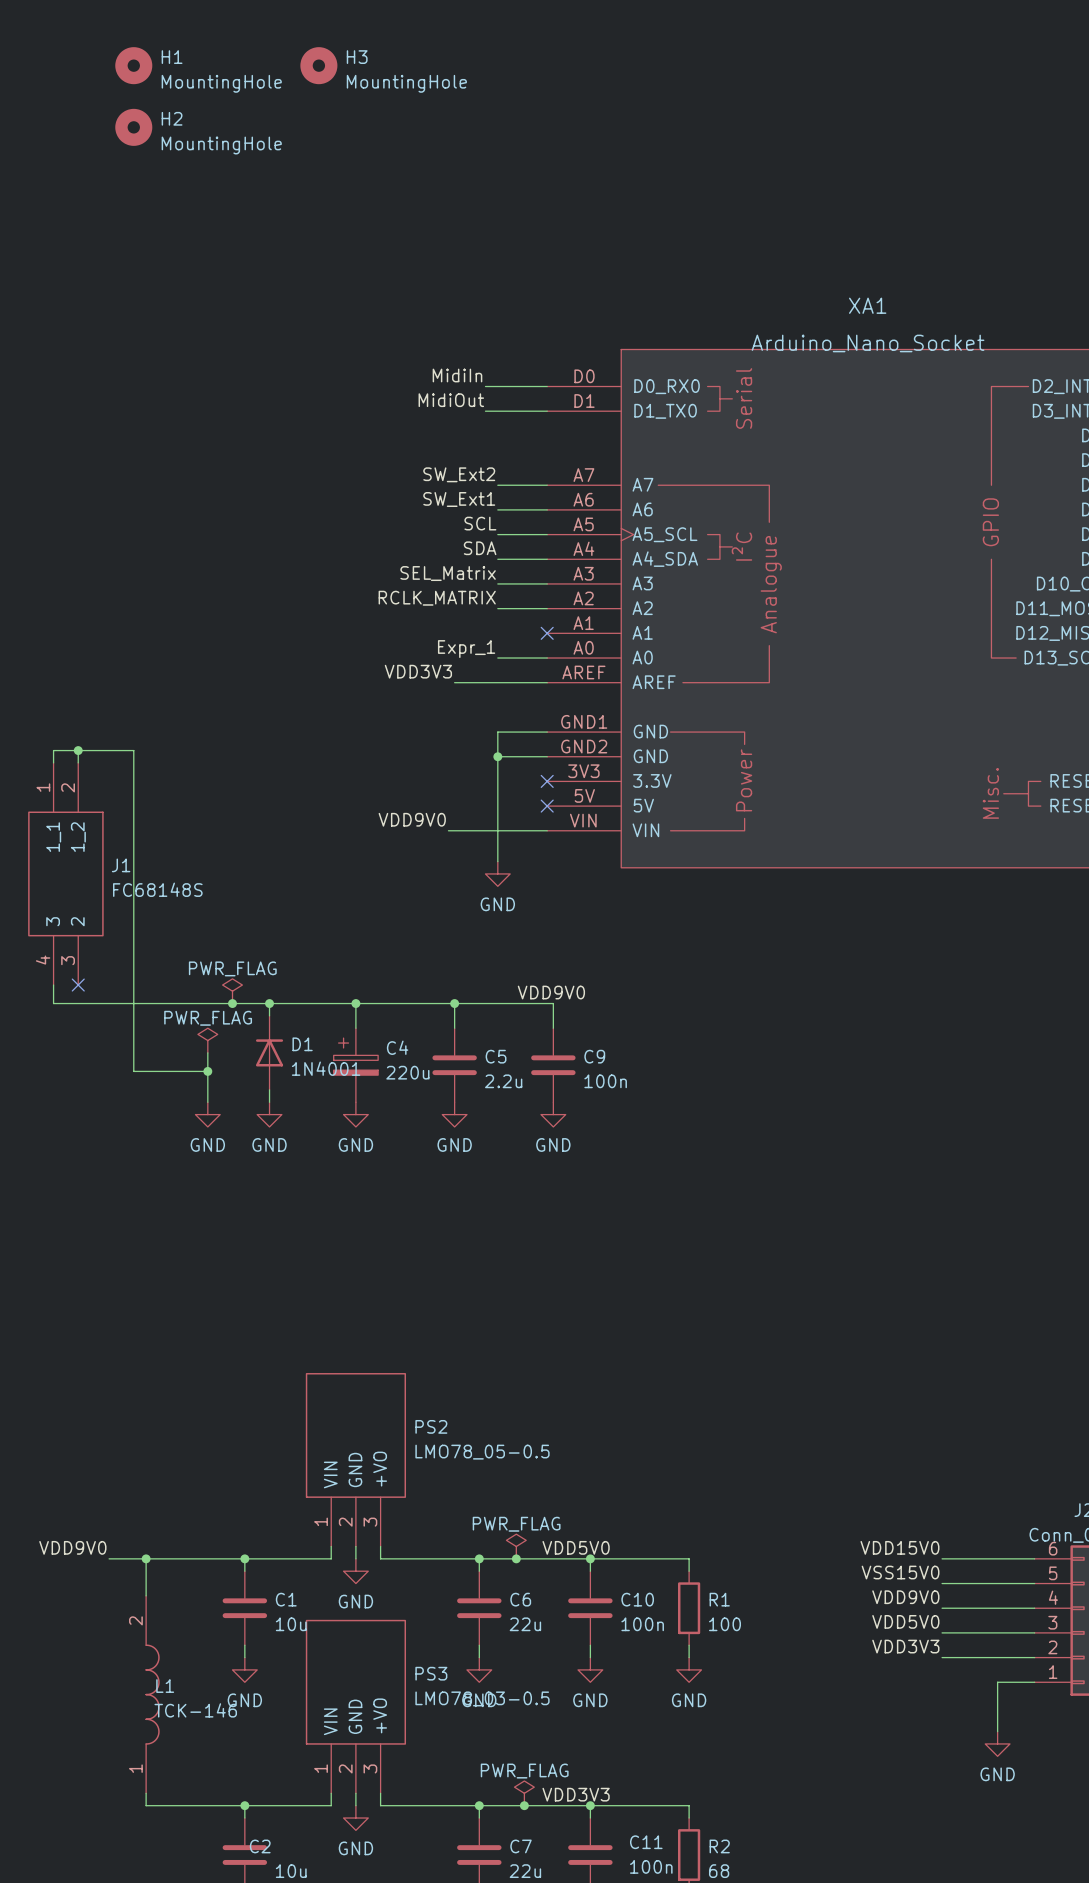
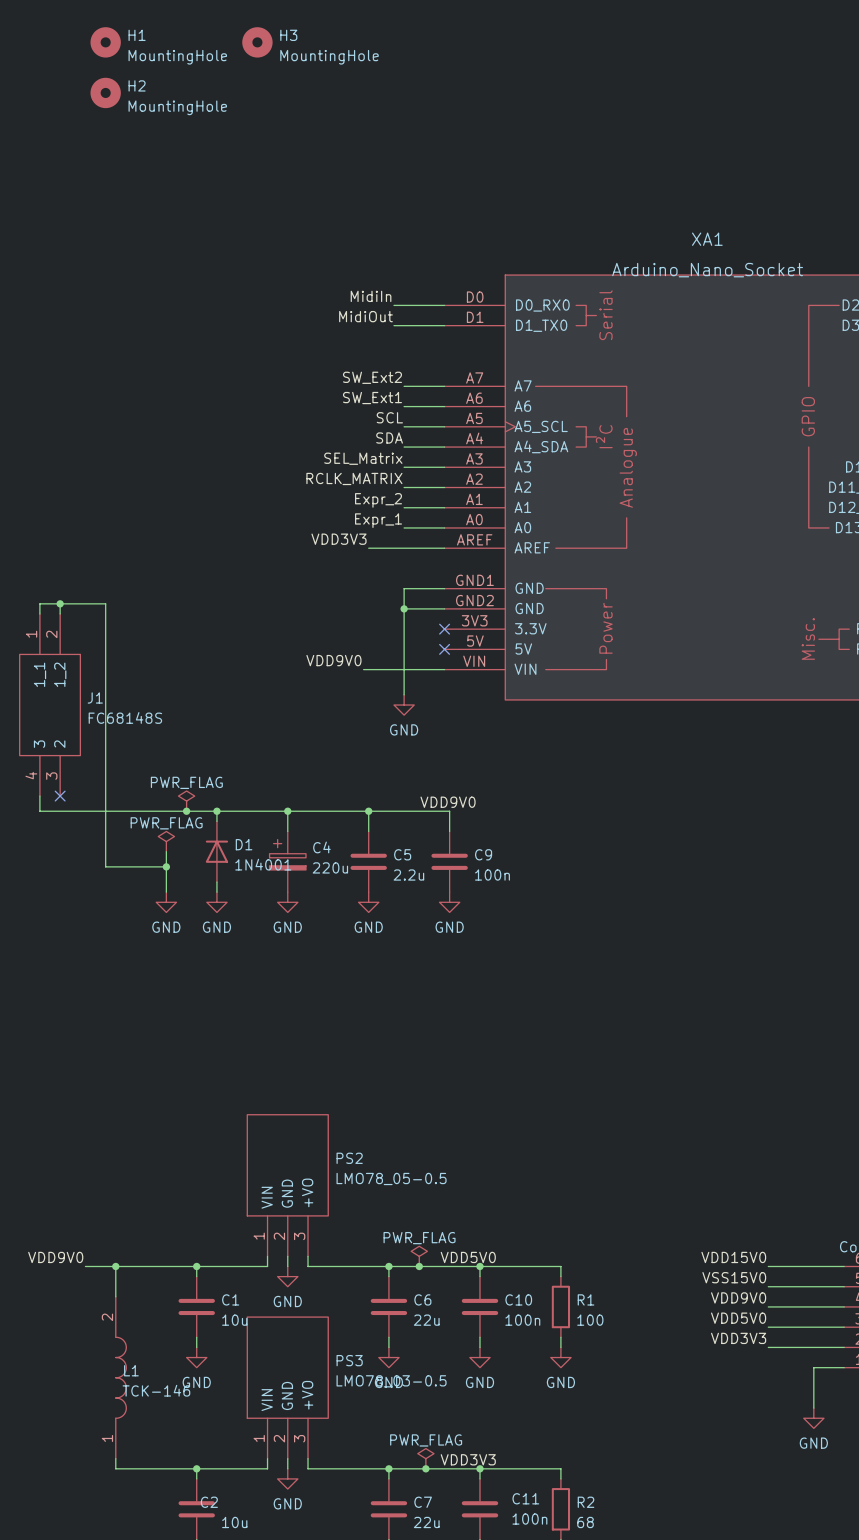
label: none -> Expr_2 (378, 500)
wire: none -> (404, 507) (444, 507)
no-connect mark: (547, 633) -> none

